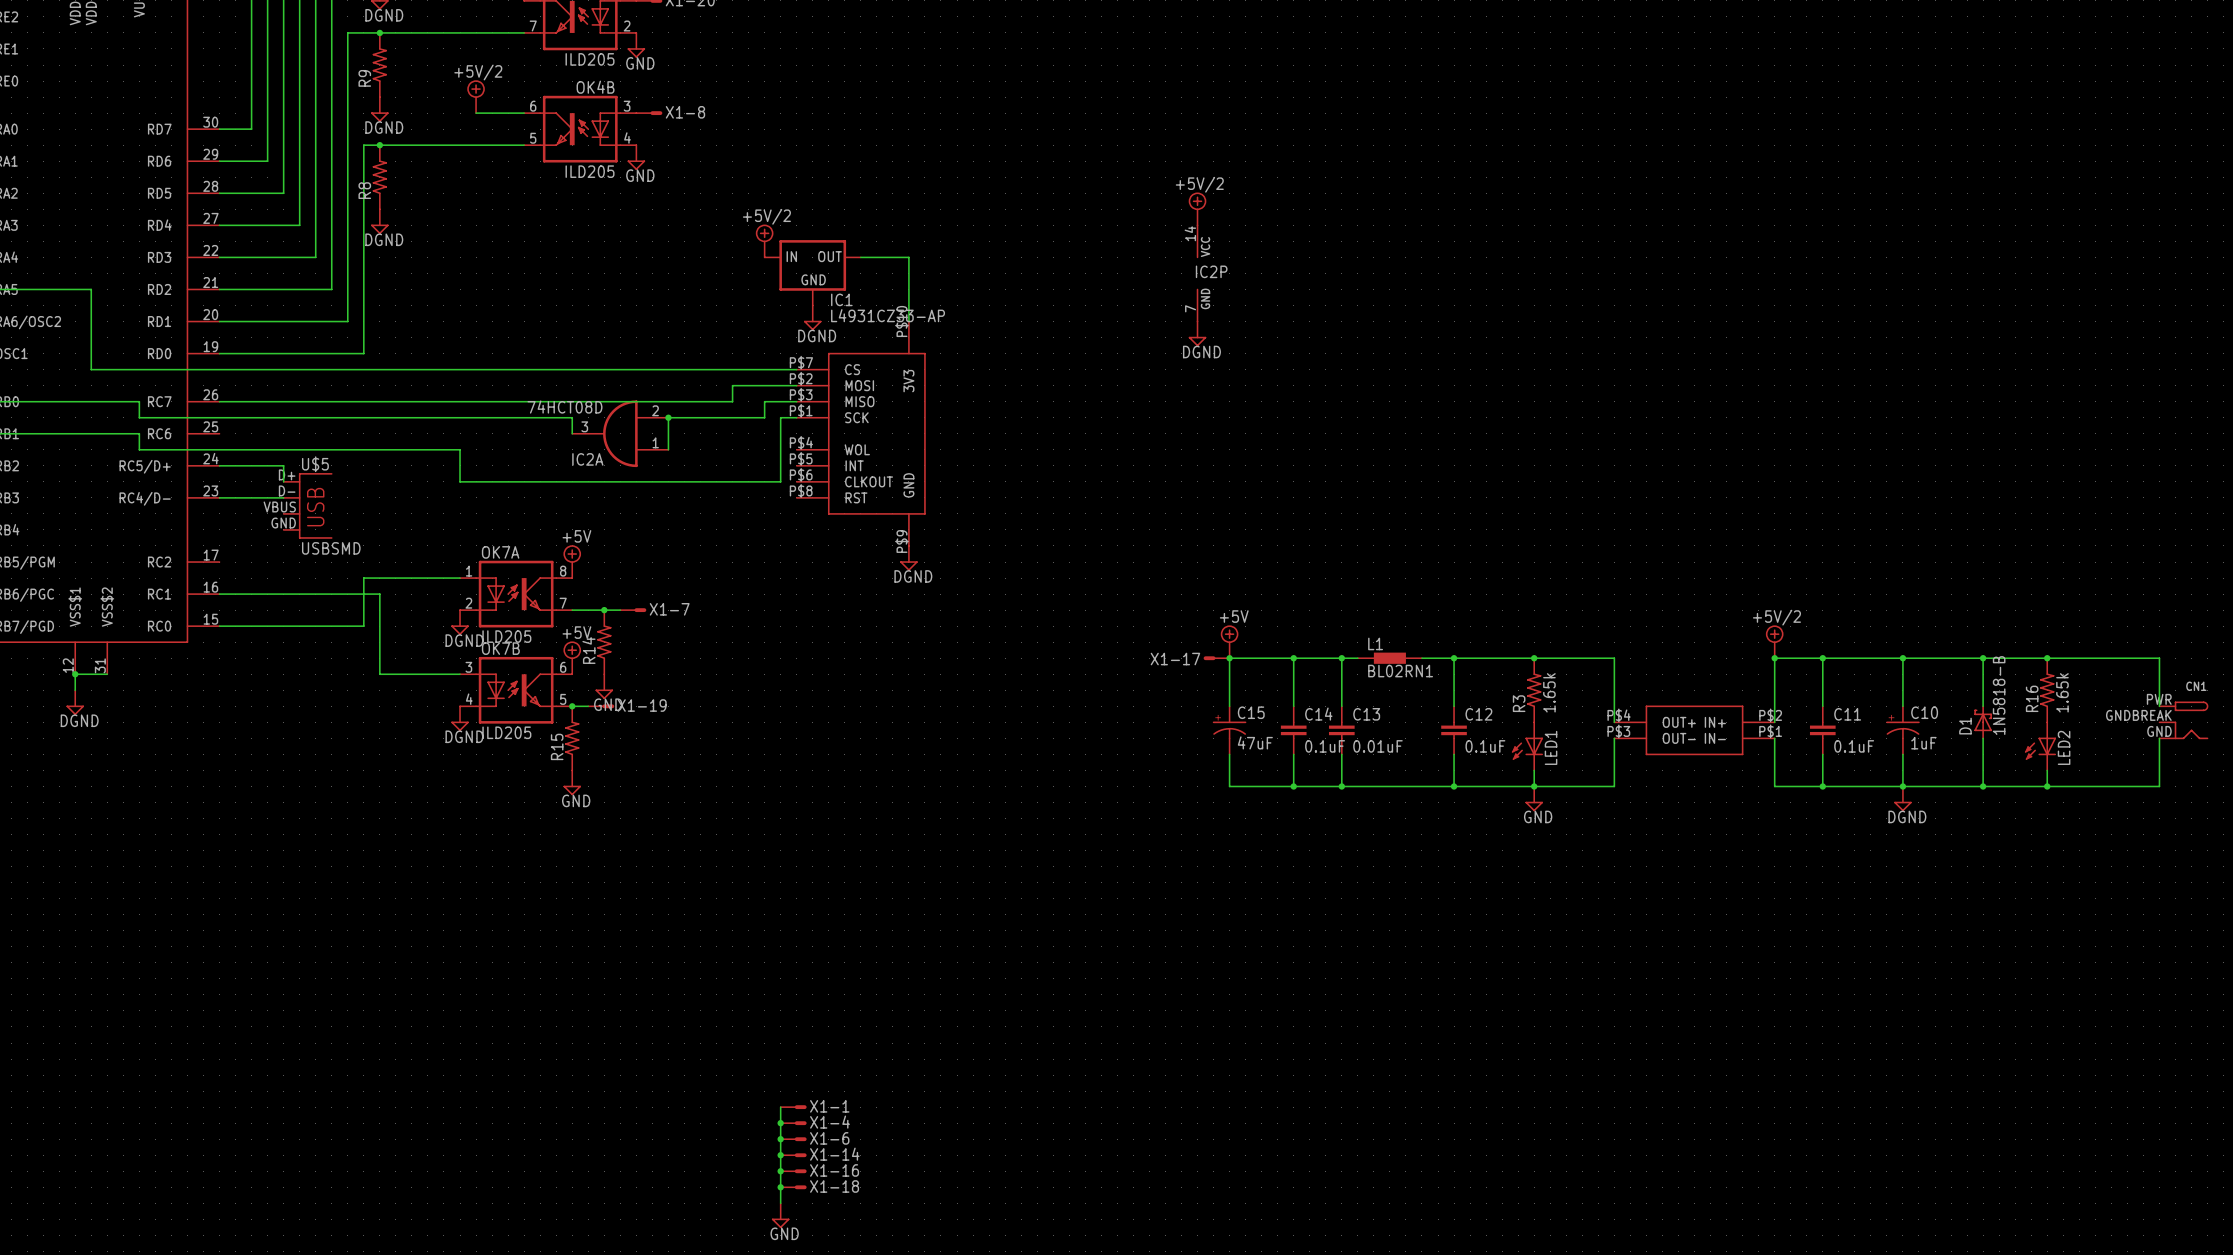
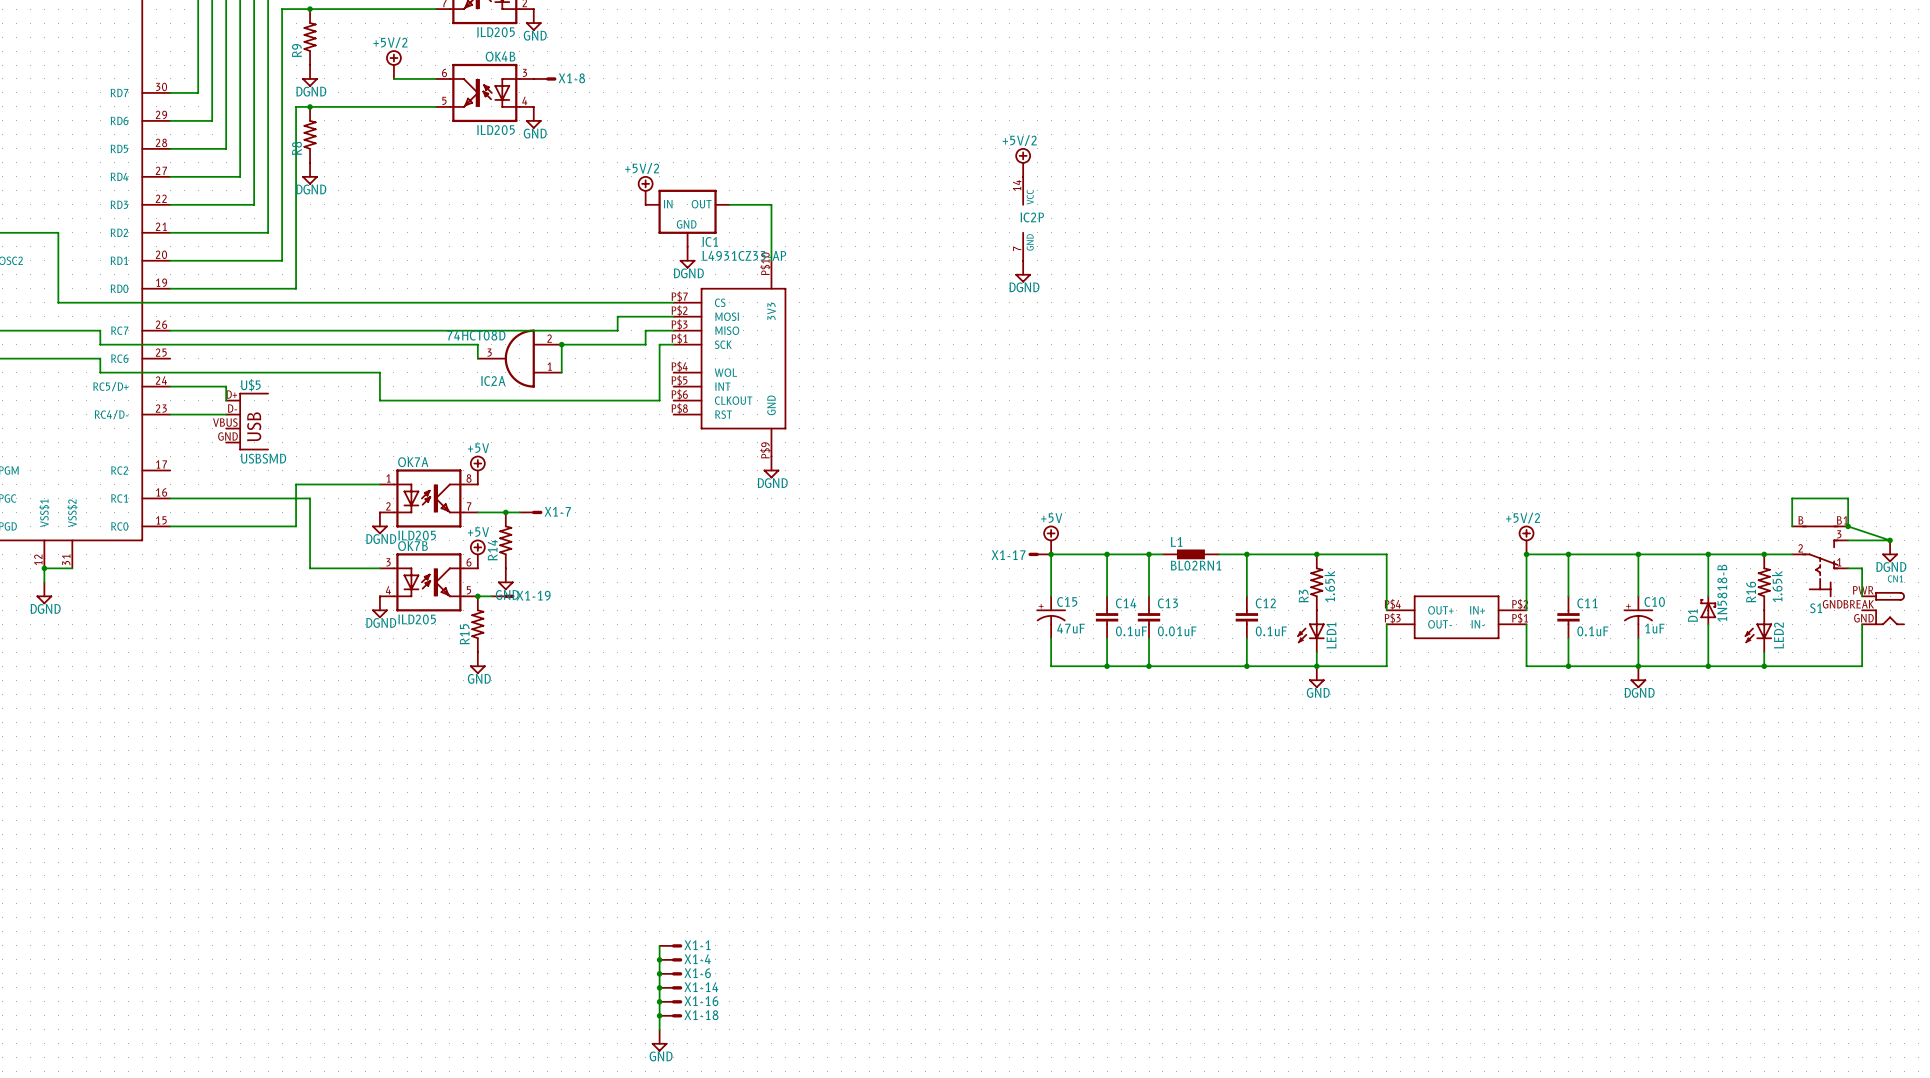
wire: none -> (1792, 526) (1792, 498) (1848, 498) (1848, 526) (1890, 540) (1848, 540)
junction: none -> (1848, 526)
junction: none -> (1890, 540)
power symbol: none -> DGND (1890, 551)
wire: (2079, 658) (2159, 658) (2159, 674) -> (1848, 568) (1862, 568)
S1: none -> (1820, 561)

